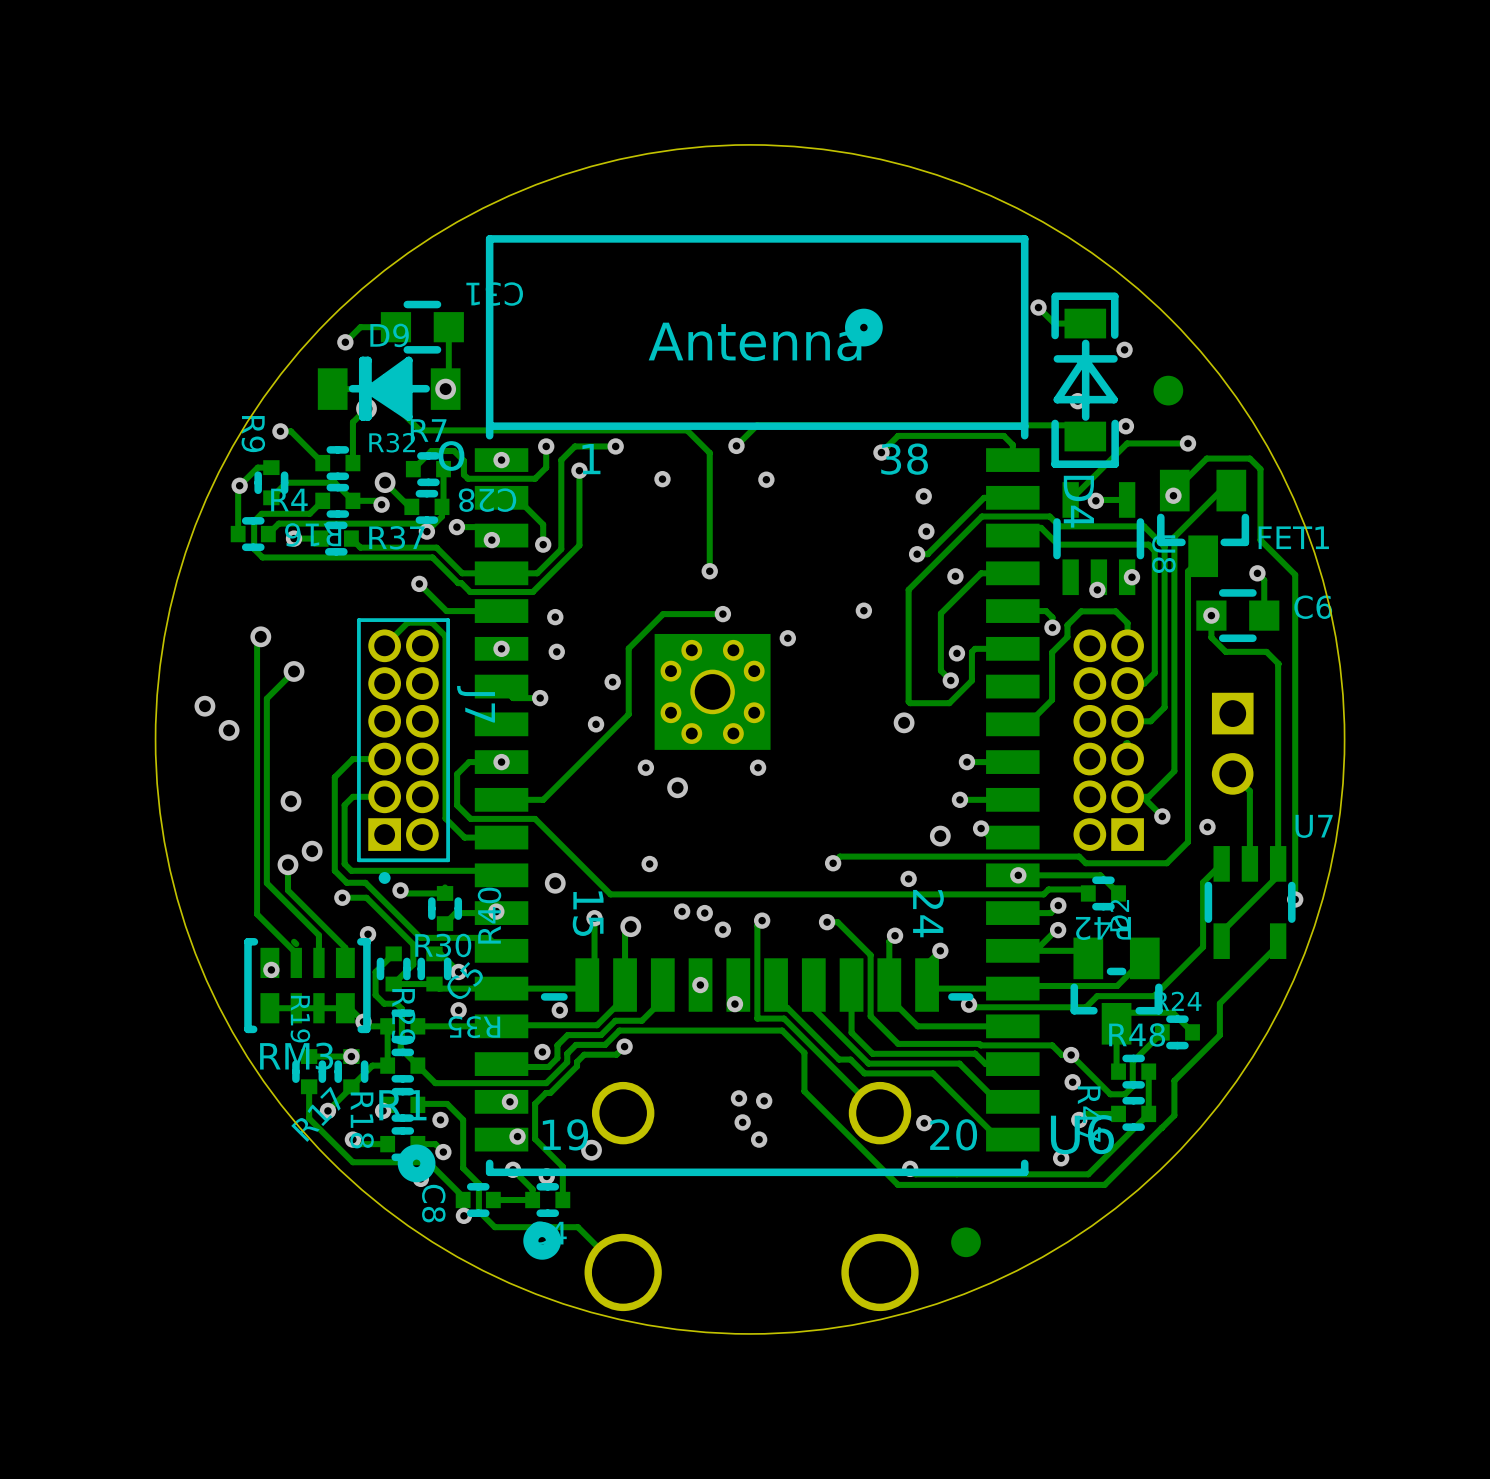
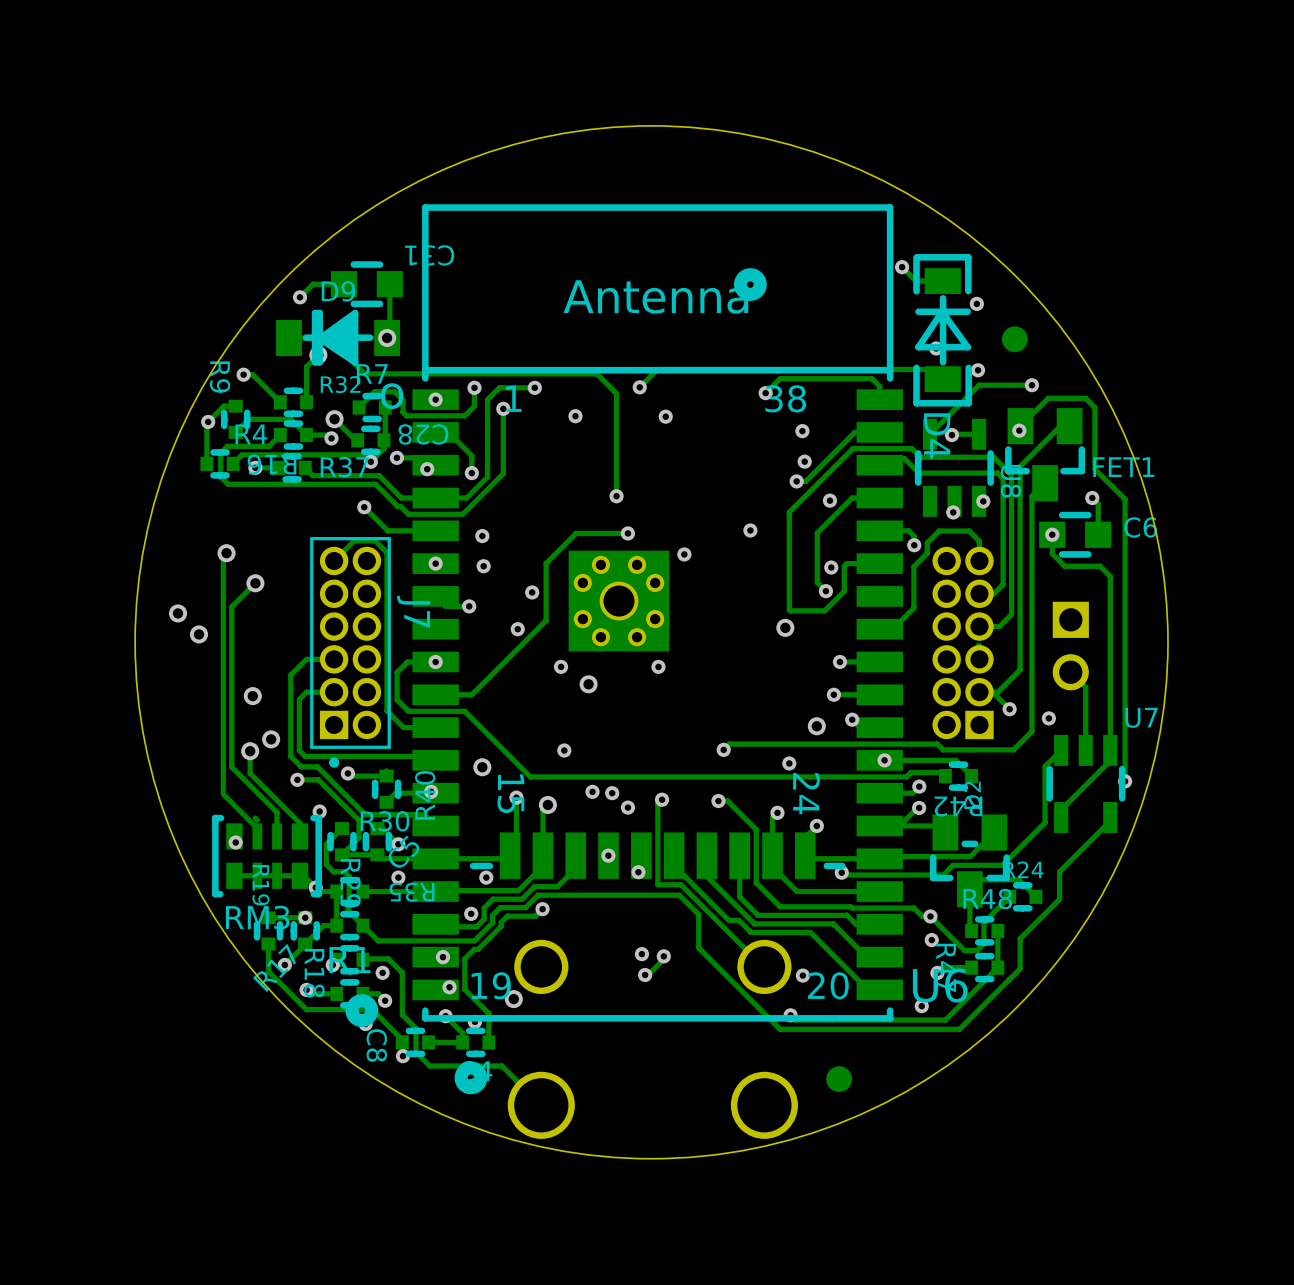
track: none -> (663, 956) (663, 959) (646, 976)
via: (759, 1139) -> none

